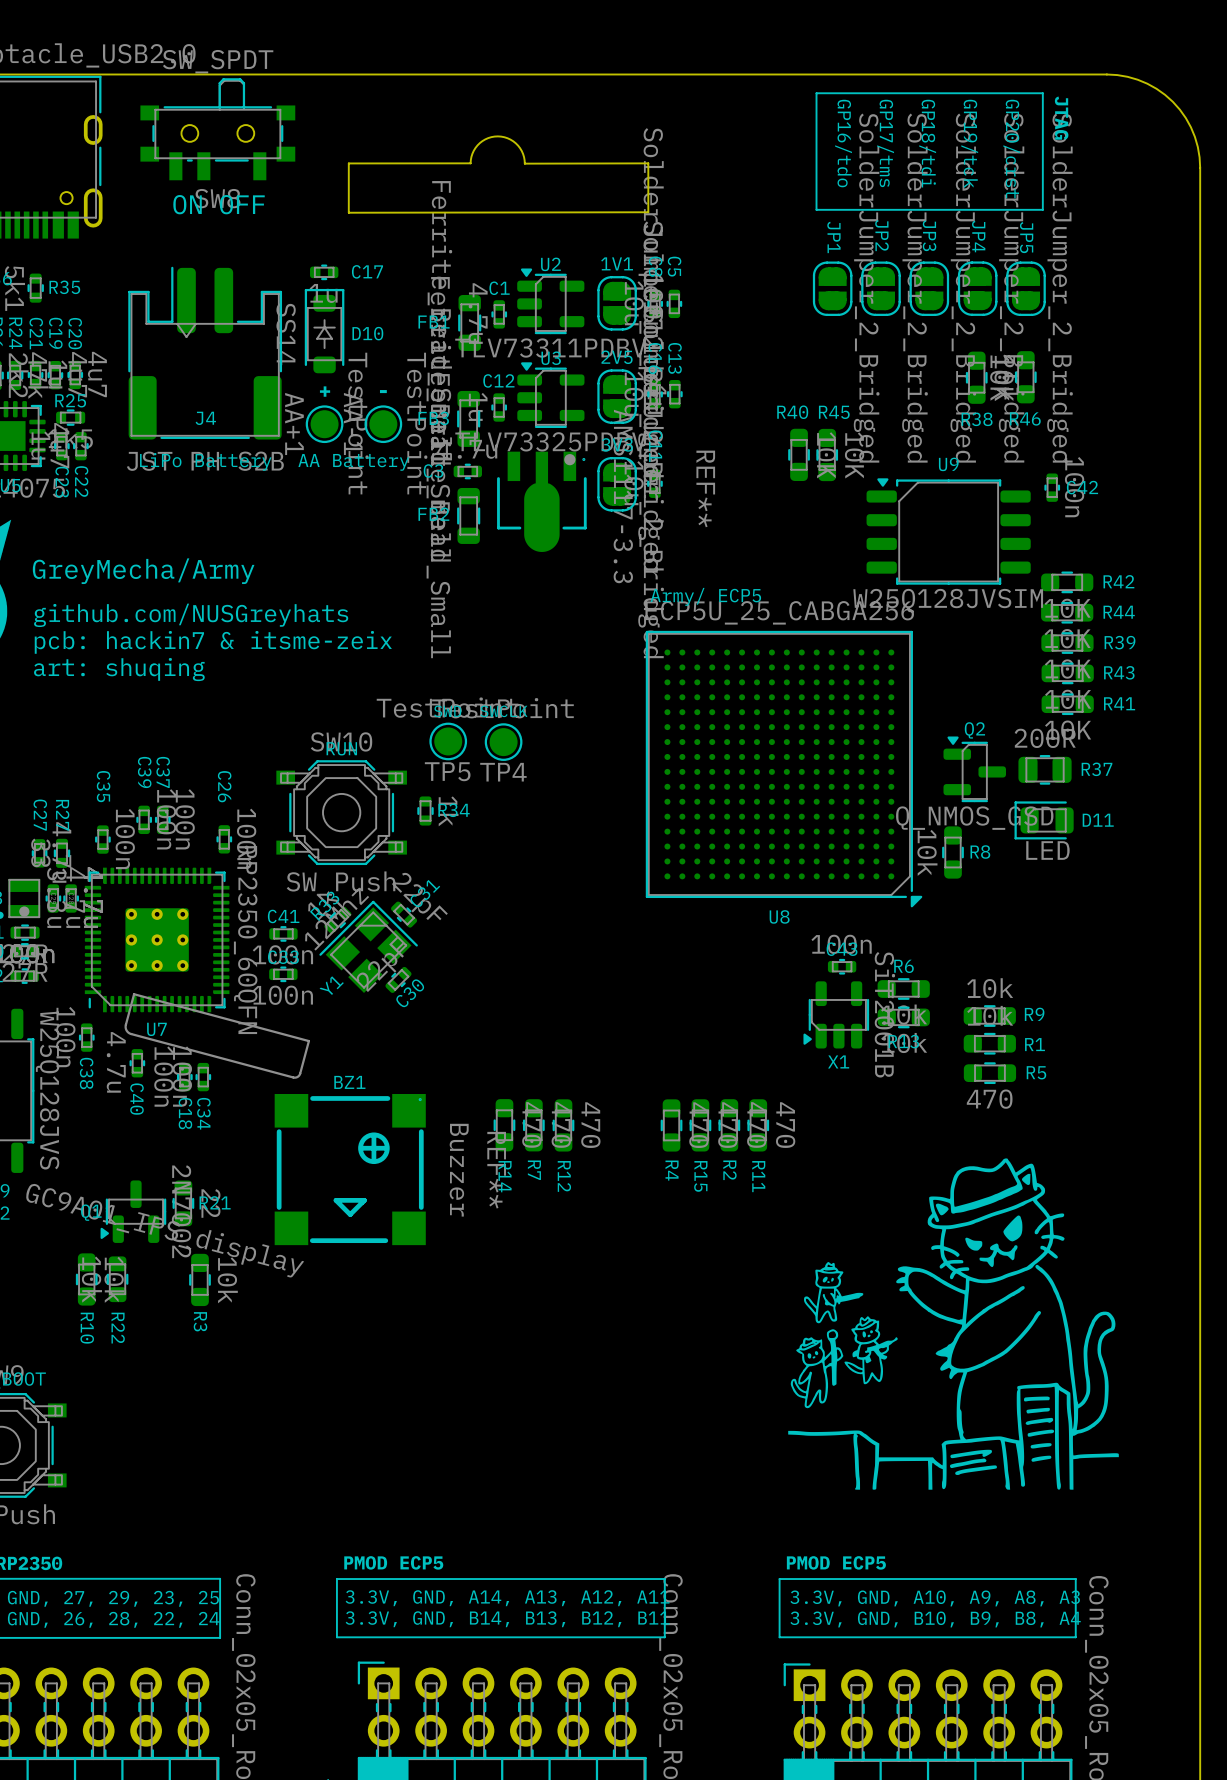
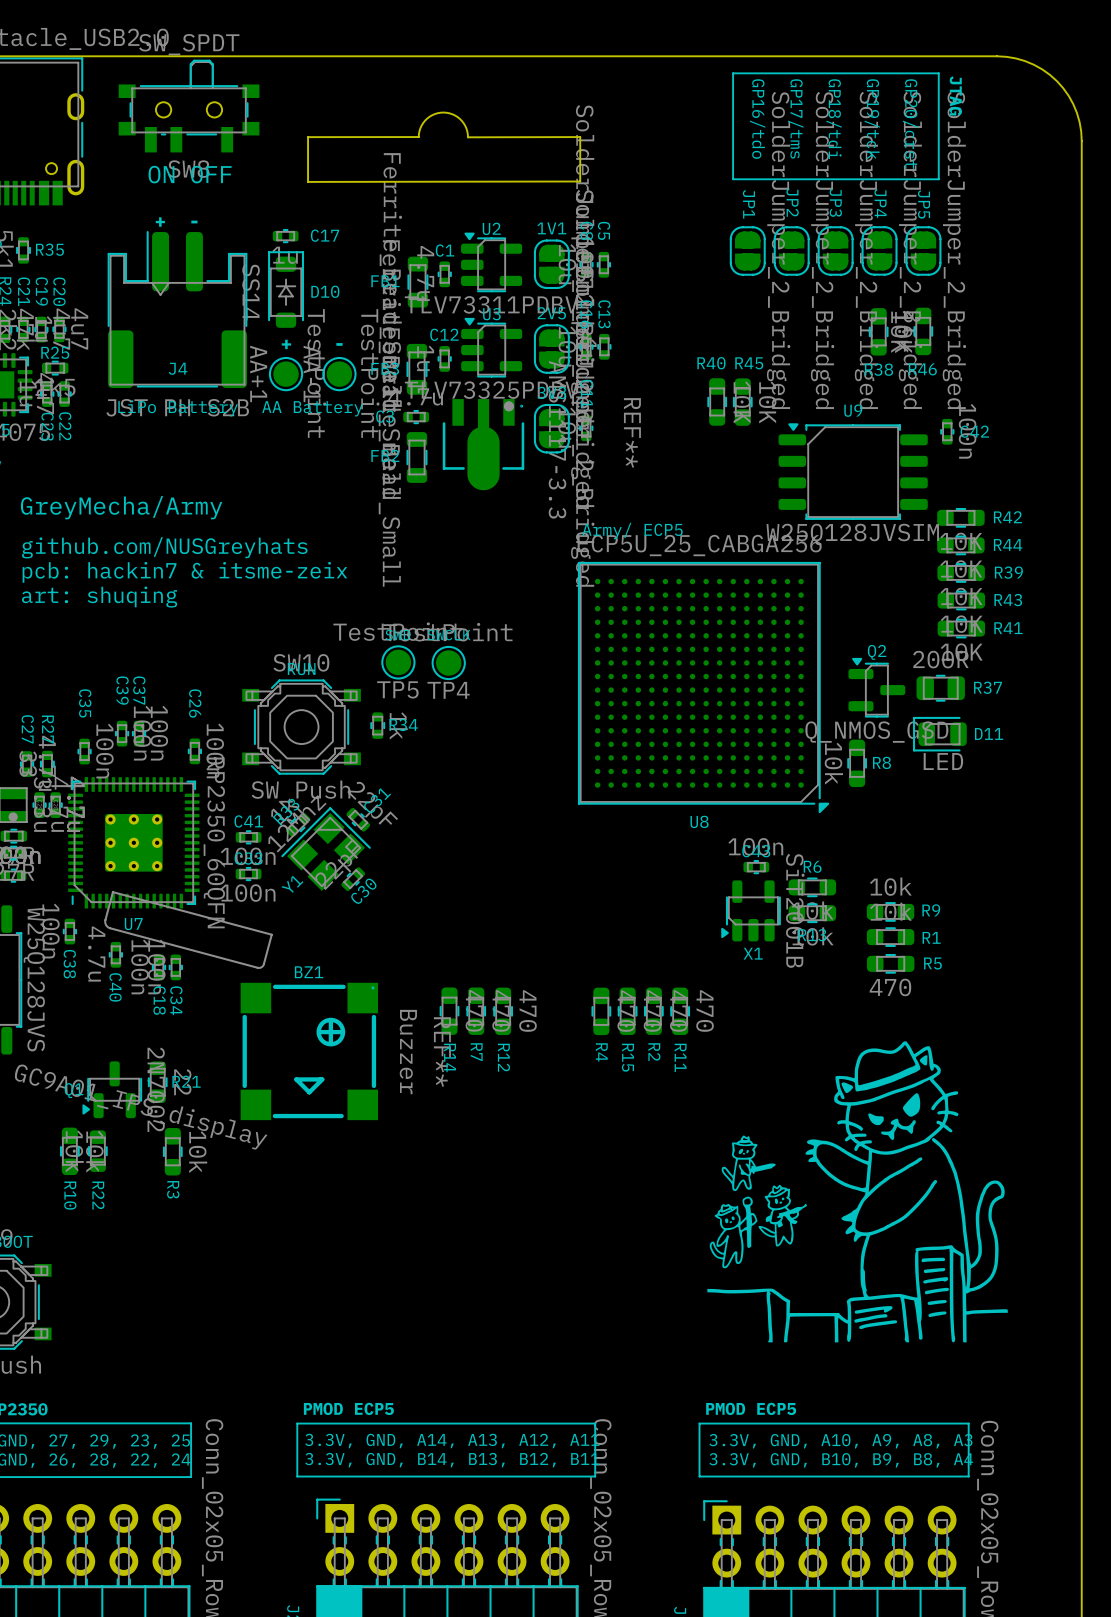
text: none -> + (160, 222)
text: none -> - (194, 222)

